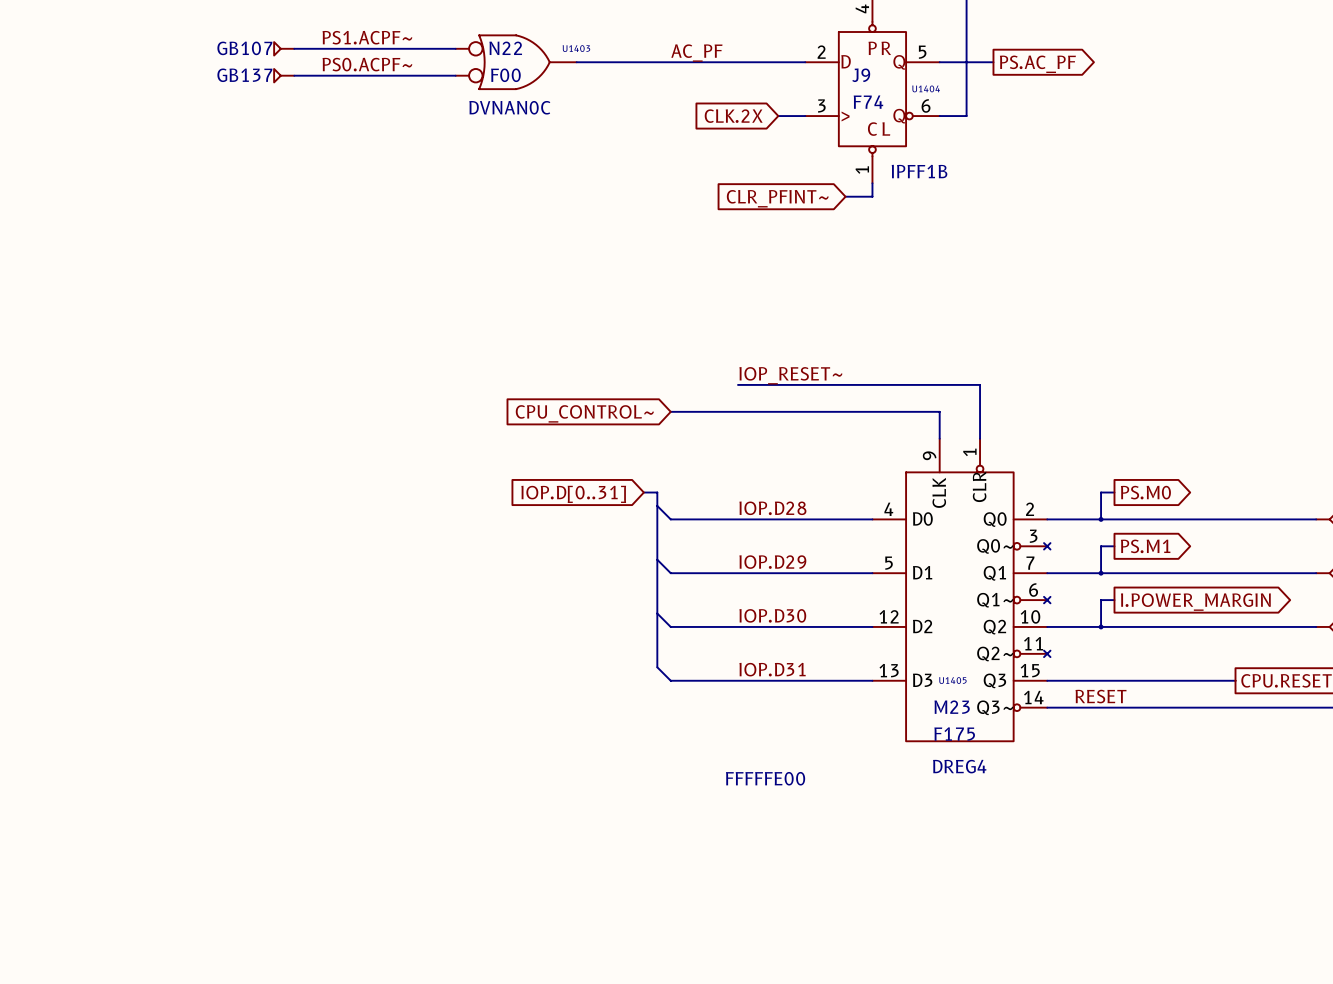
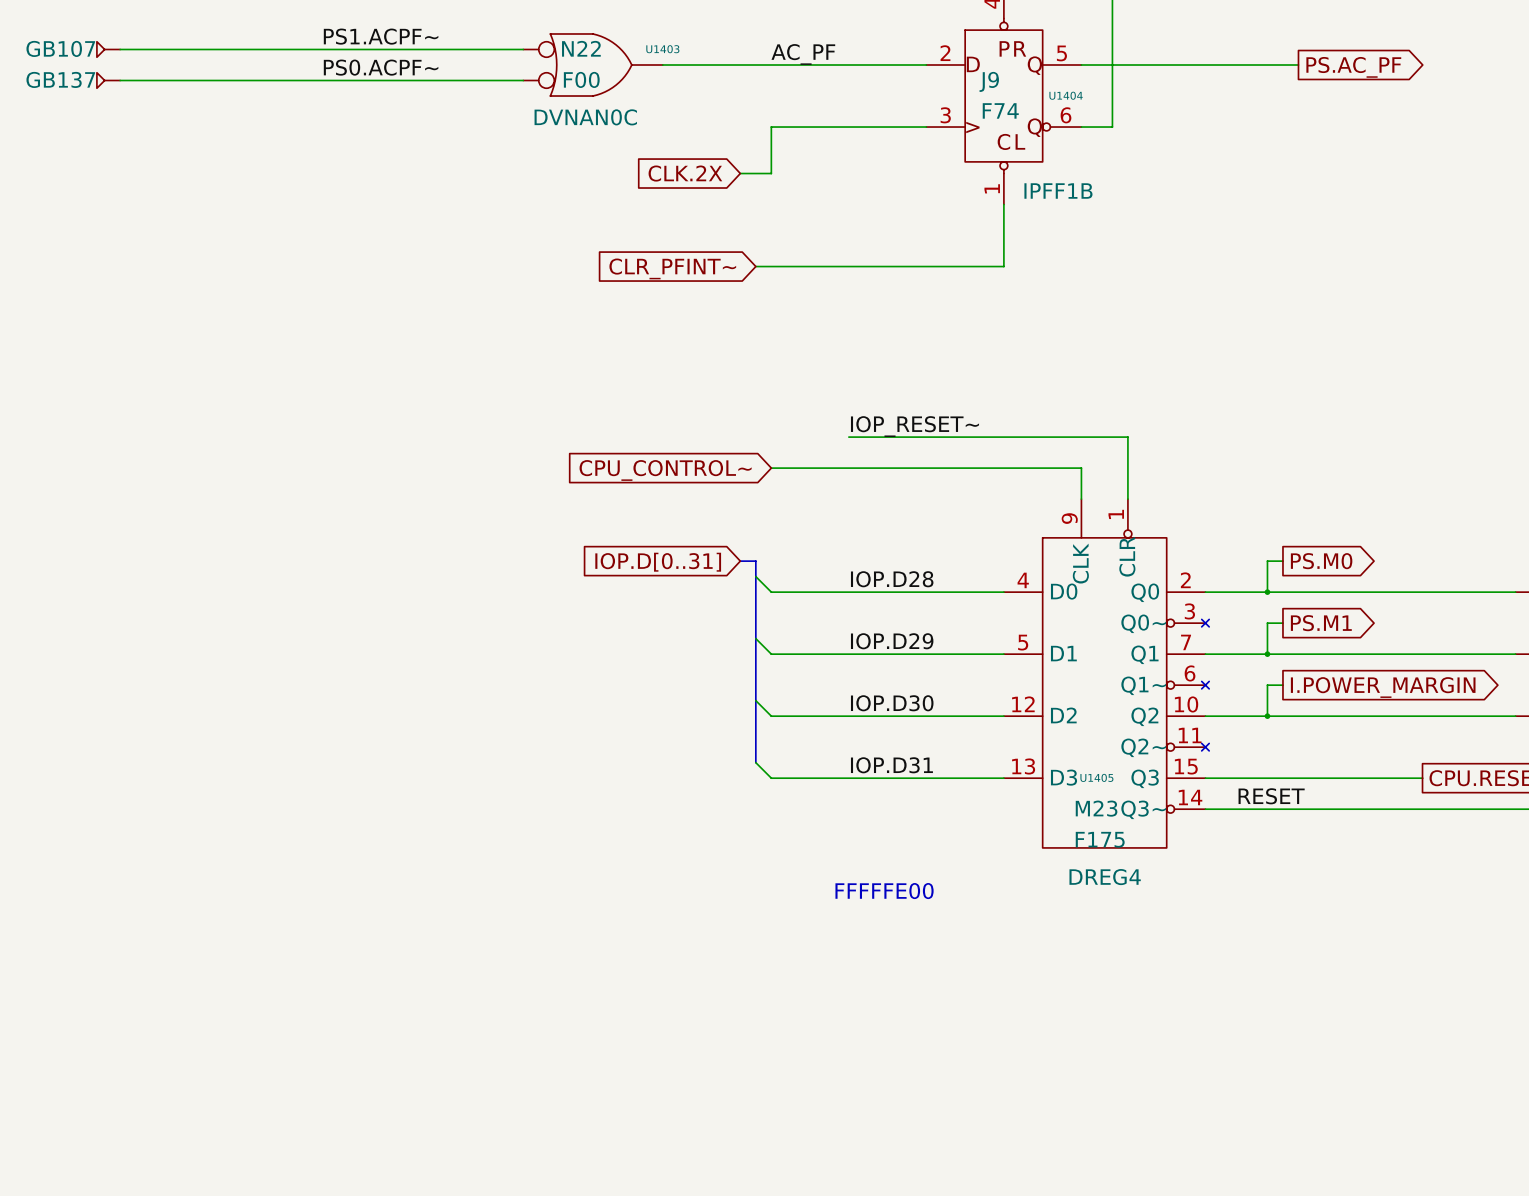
label position: PS1.ACPF~ (367, 37) -> PS1.ACPF~ (381, 36)
wire: none -> (120, 49) (337, 49)
GB107 position: (284, 48) -> (108, 49)
wire: none -> (1143, 65) (1298, 65)
label position: PS0.ACPF~ (367, 64) -> PS0.ACPF~ (381, 67)
global label: PS.AC_PF (1037, 64) -> none
global label: none -> PS.AC_PF (1353, 67)
wire: none -> (120, 80) (337, 80)
GB137 position: (284, 75) -> (108, 80)
global label: CLK.2X (733, 116) -> none
wire: none -> (895, 127) (771, 127) (771, 173) (740, 173)
global label: none -> CLK.2X (685, 173)
wire: (845, 196) (872, 196) -> (755, 266) (1003, 266) (1003, 220)
global label: CLR_PFINT~ (777, 198) -> none
global label: none -> CLR_PFINT~ (672, 268)

